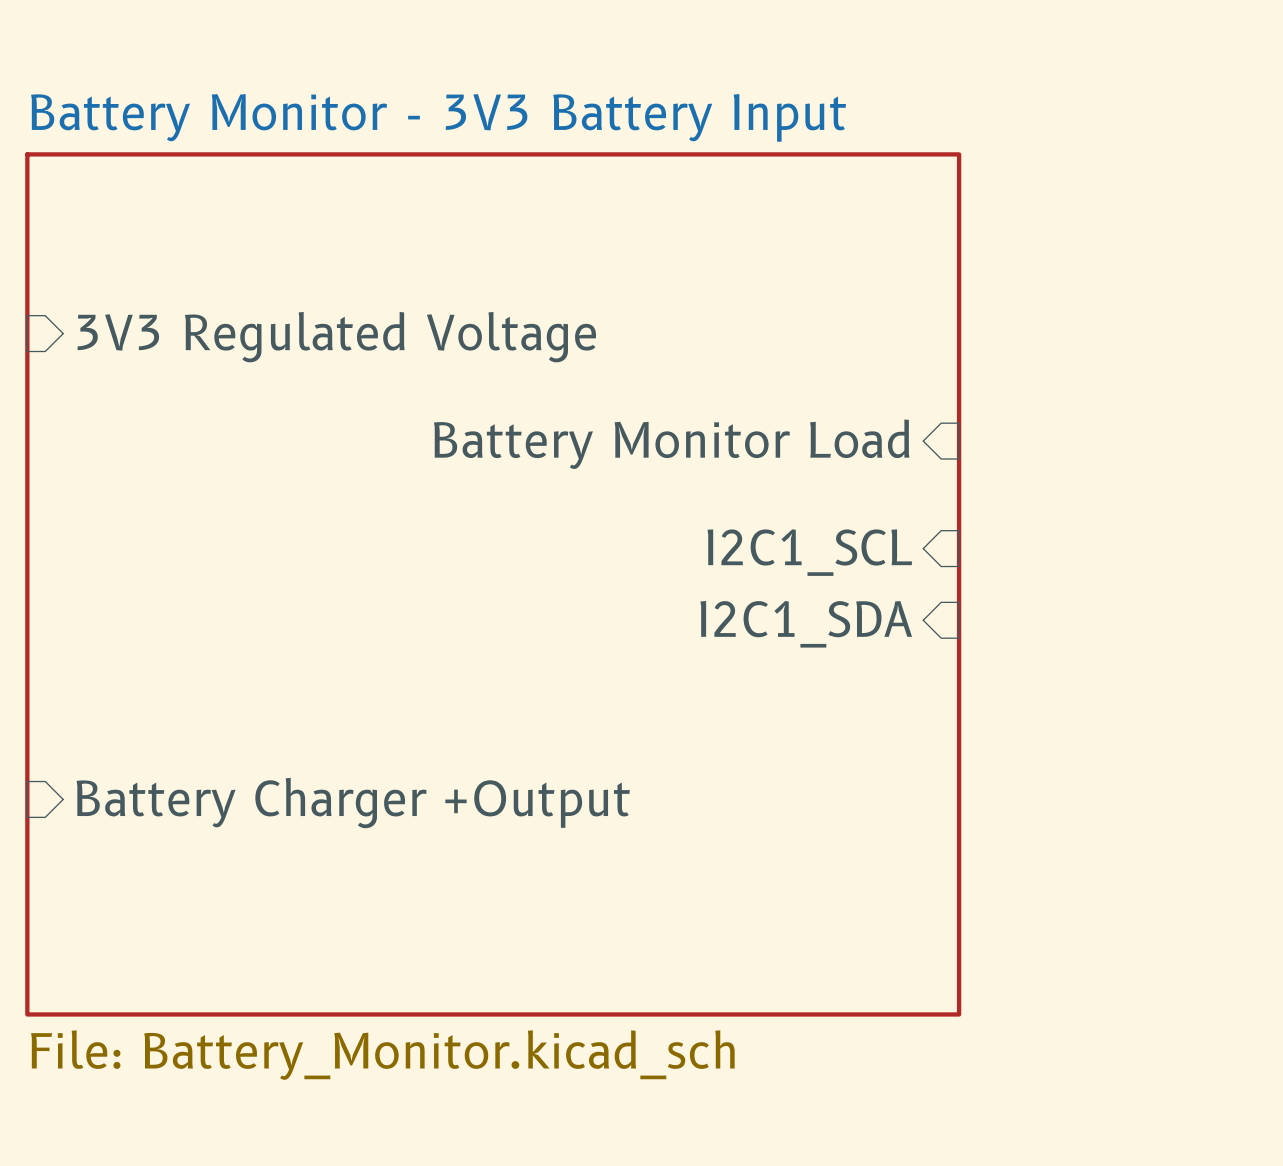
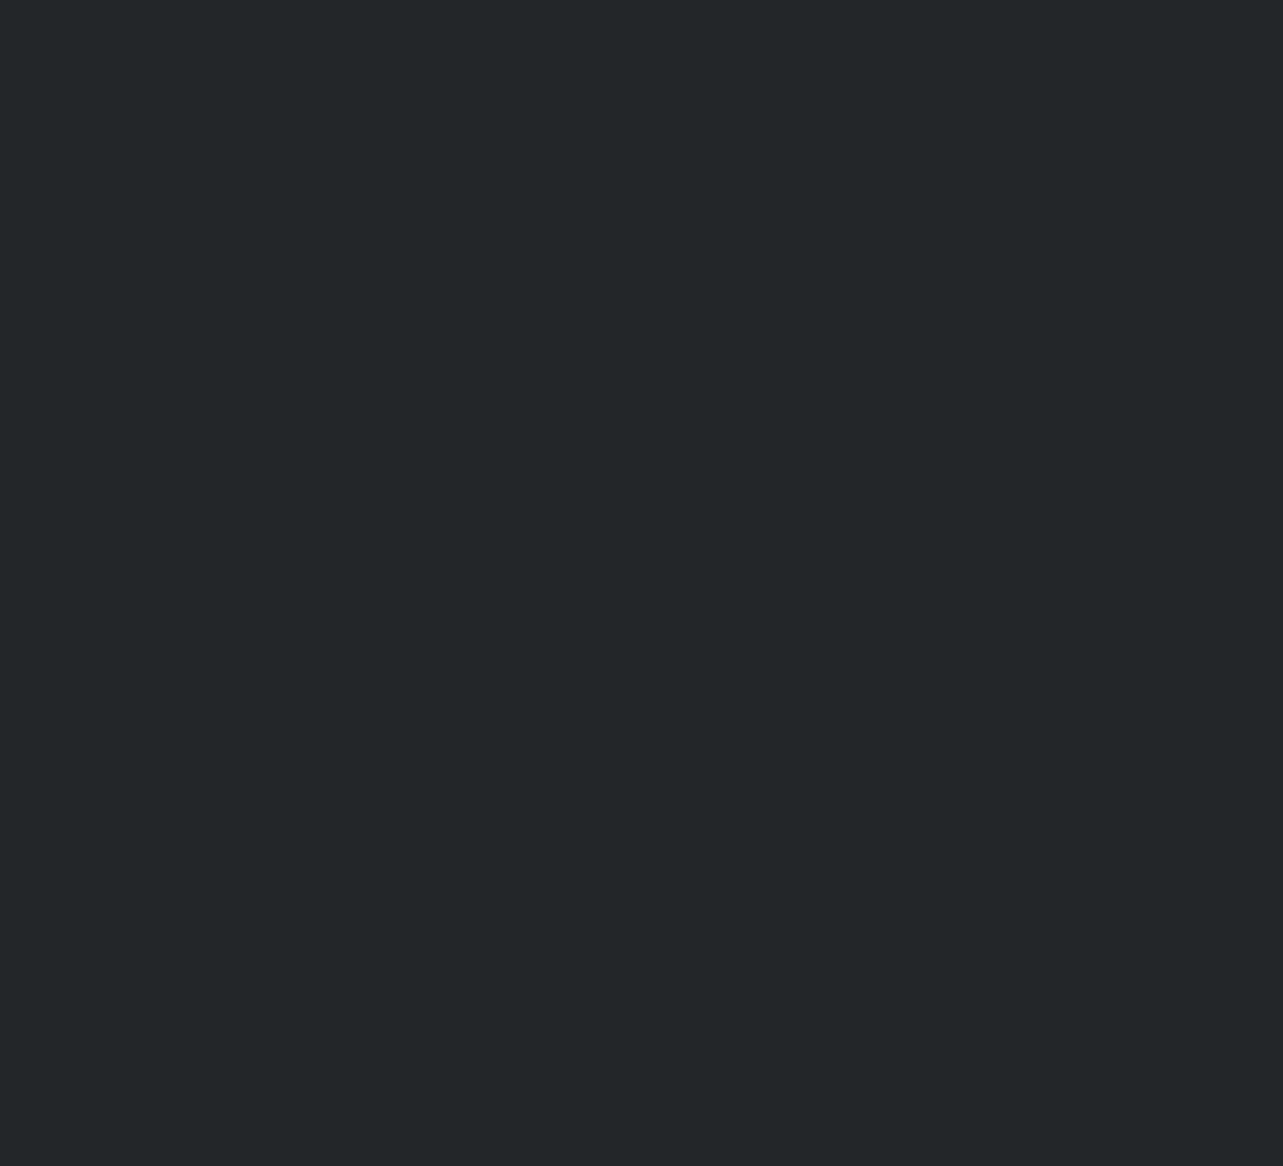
sheet pin: 3V3 Regulated Voltage (336, 337) -> none
sheet pin: Battery Monitor Load (671, 444) -> none
sheet pin: I2C1_SCL (809, 552) -> none
sheet Battery Monitor - 3V3 Battery Input: File: Battery_Monitor.kicad_sch (493, 584) -> none
sheet pin: I2C1_SDA (806, 624) -> none
sheet pin: Battery Charger +Output (353, 803) -> none

